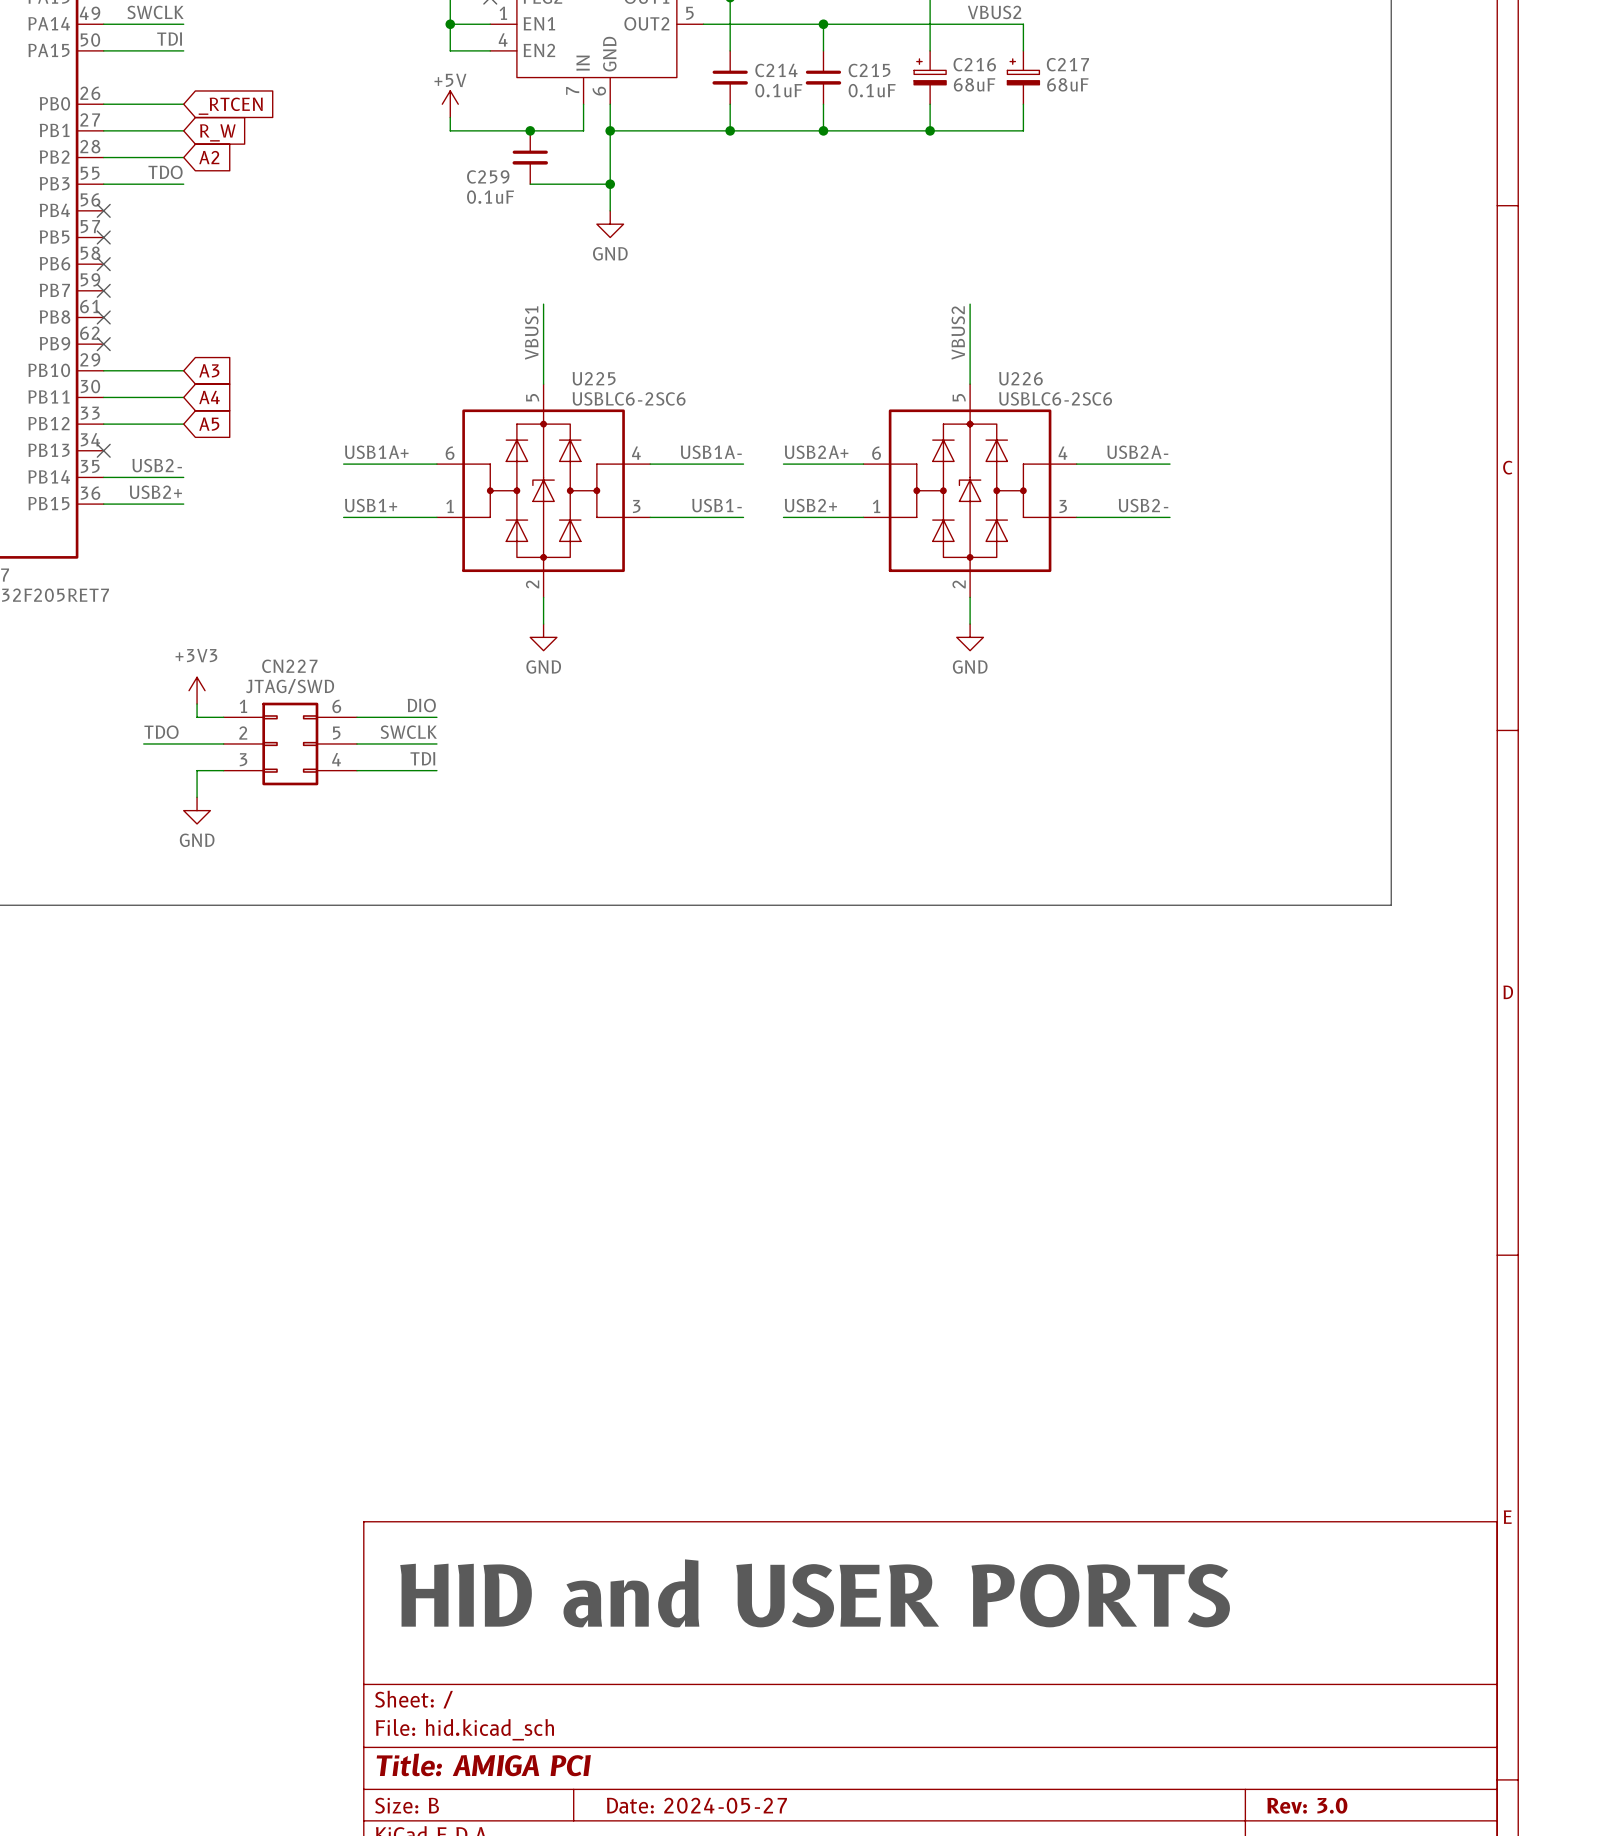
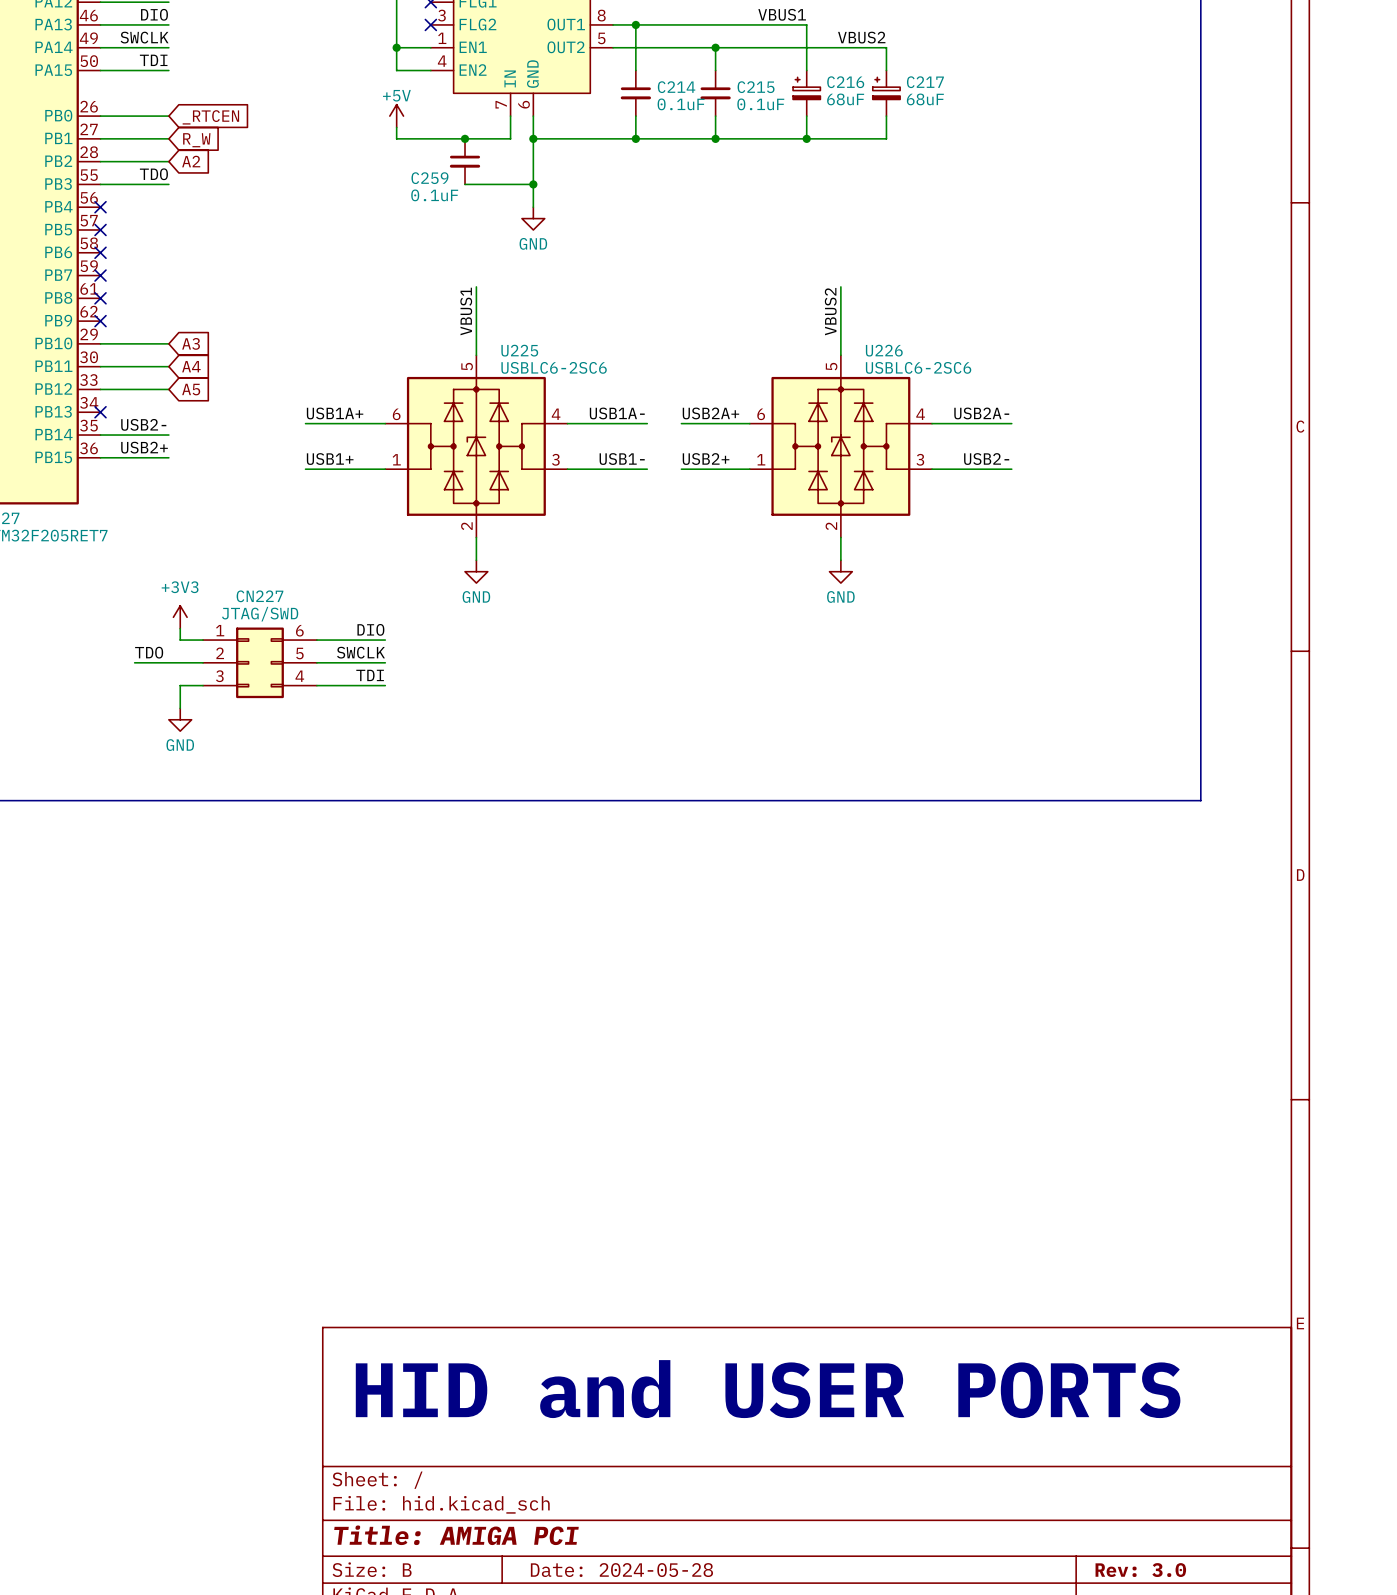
title block: Date: 2024-05-27 (696, 1805) -> Date: 2024-05-28 (621, 1570)

